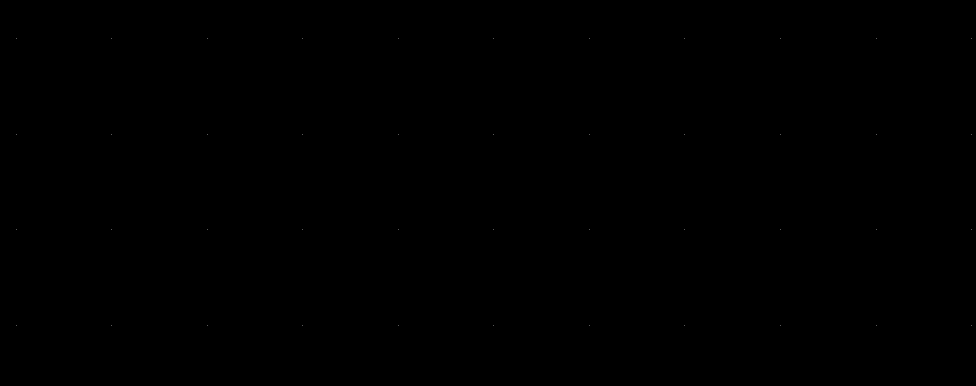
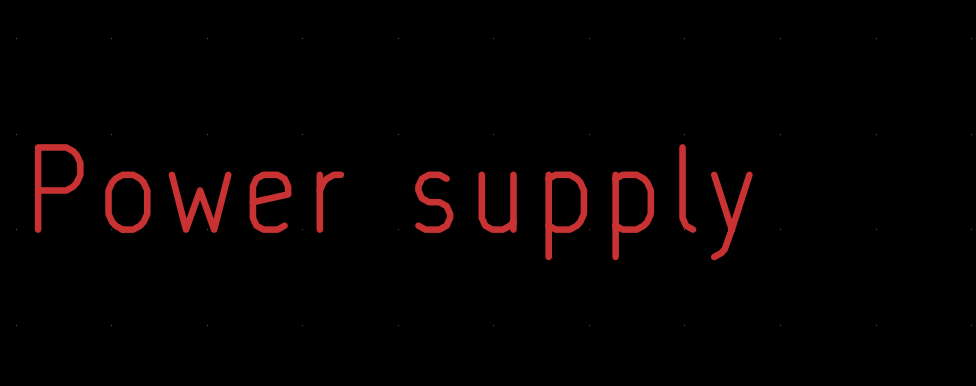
text: none -> Power supply (393, 202)

